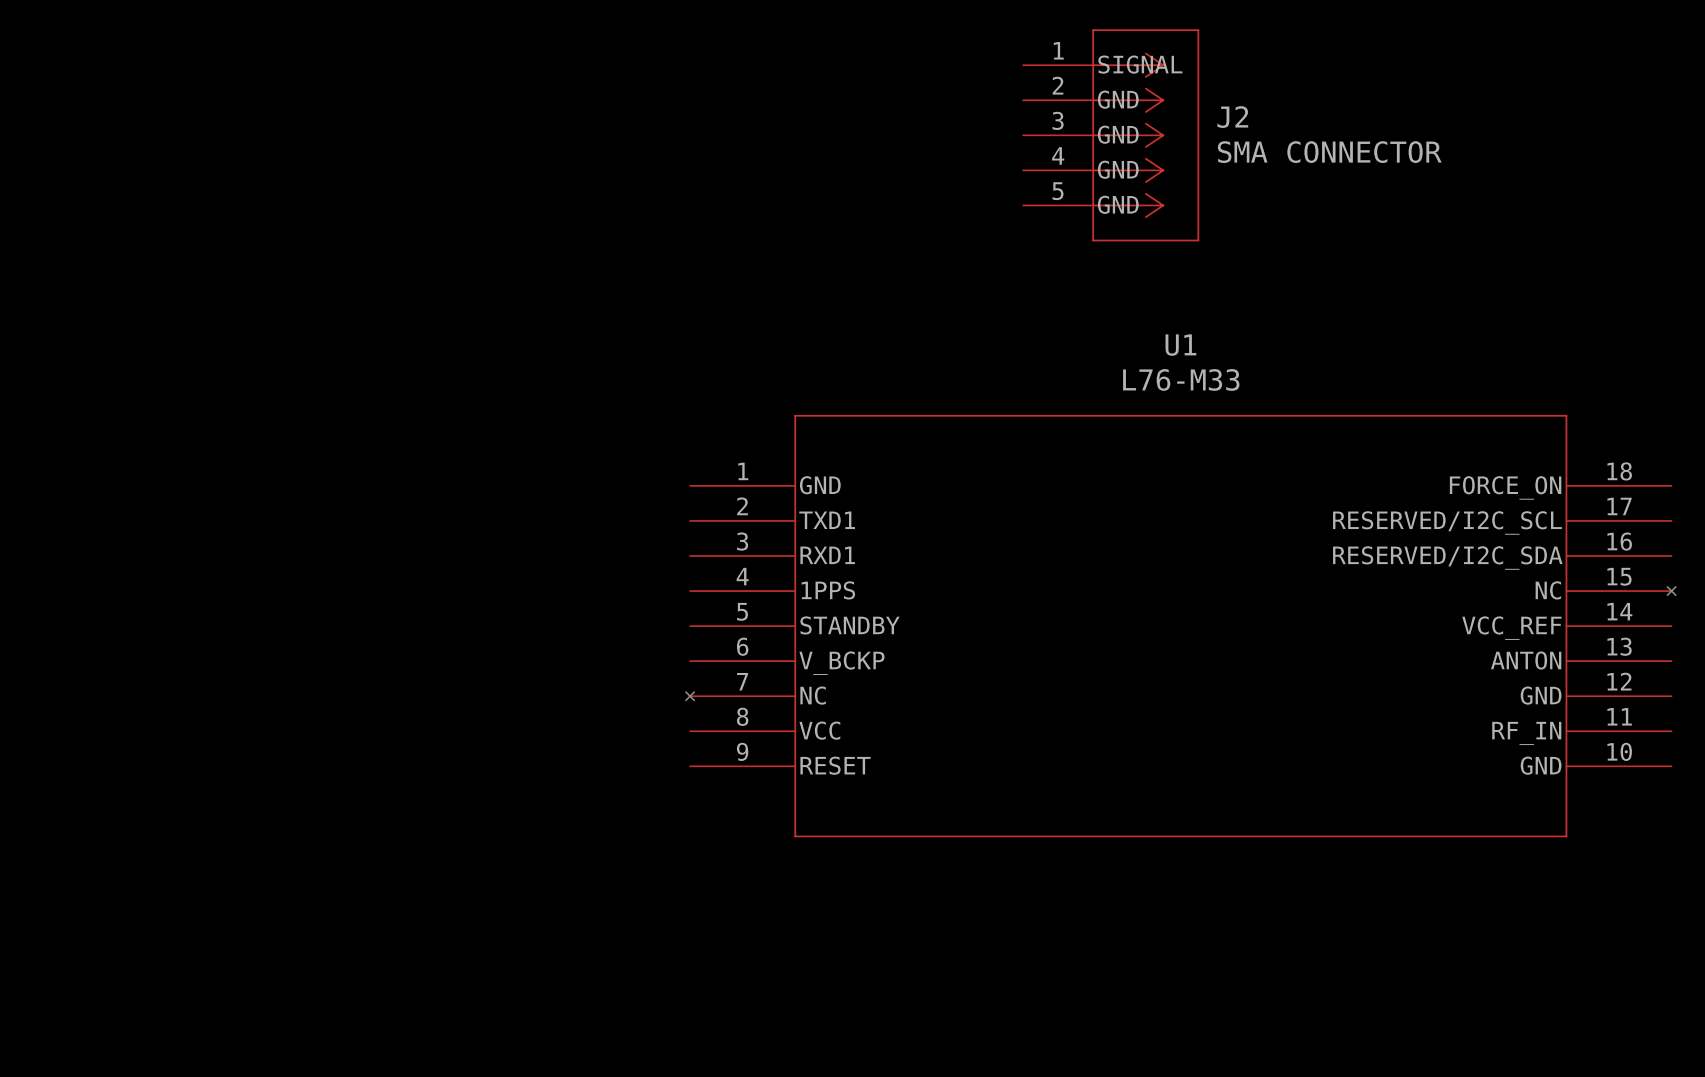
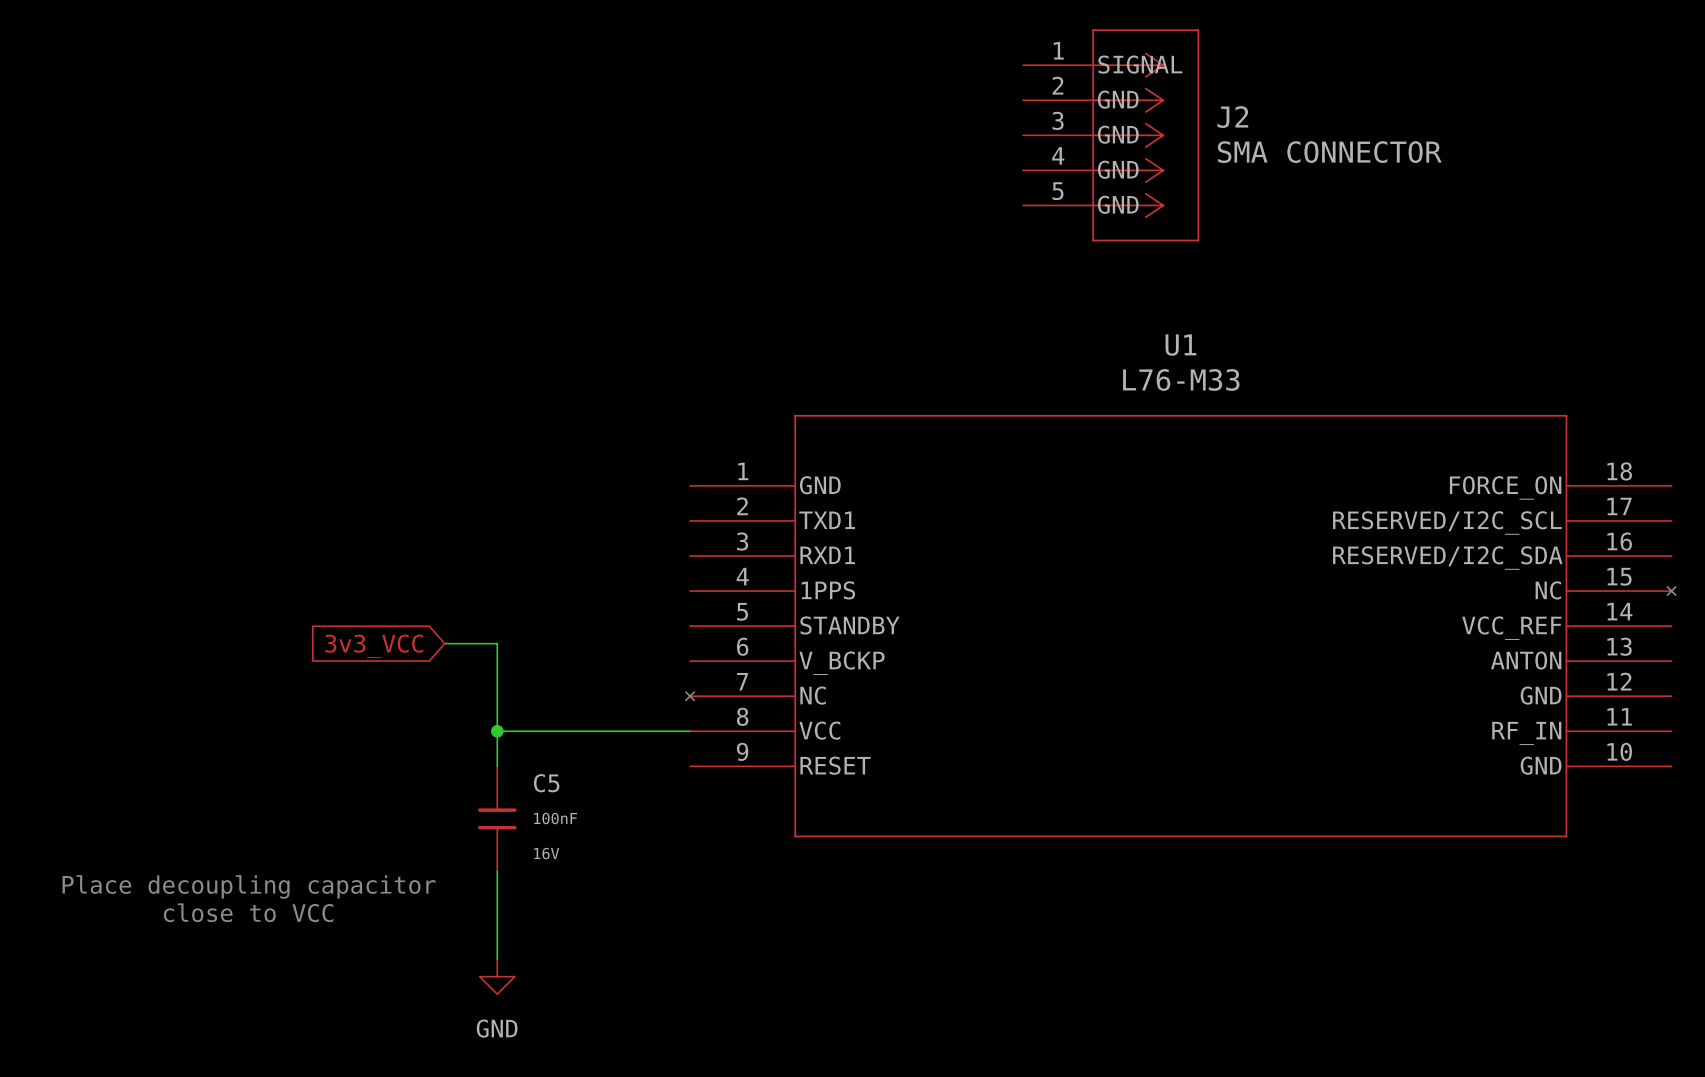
wire: none -> (444, 643) (497, 643) (497, 766)
global label: none -> 3v3_VCC (374, 646)
wire: none -> (497, 731) (690, 731)
junction: none -> (497, 731)
C5: none -> 100nF (497, 818)
wire: none -> (497, 871) (497, 959)
text: none -> Place decoupling capacitor (249, 886)
text: none -> close to VCC (248, 912)
power symbol: none -> GND (497, 976)

